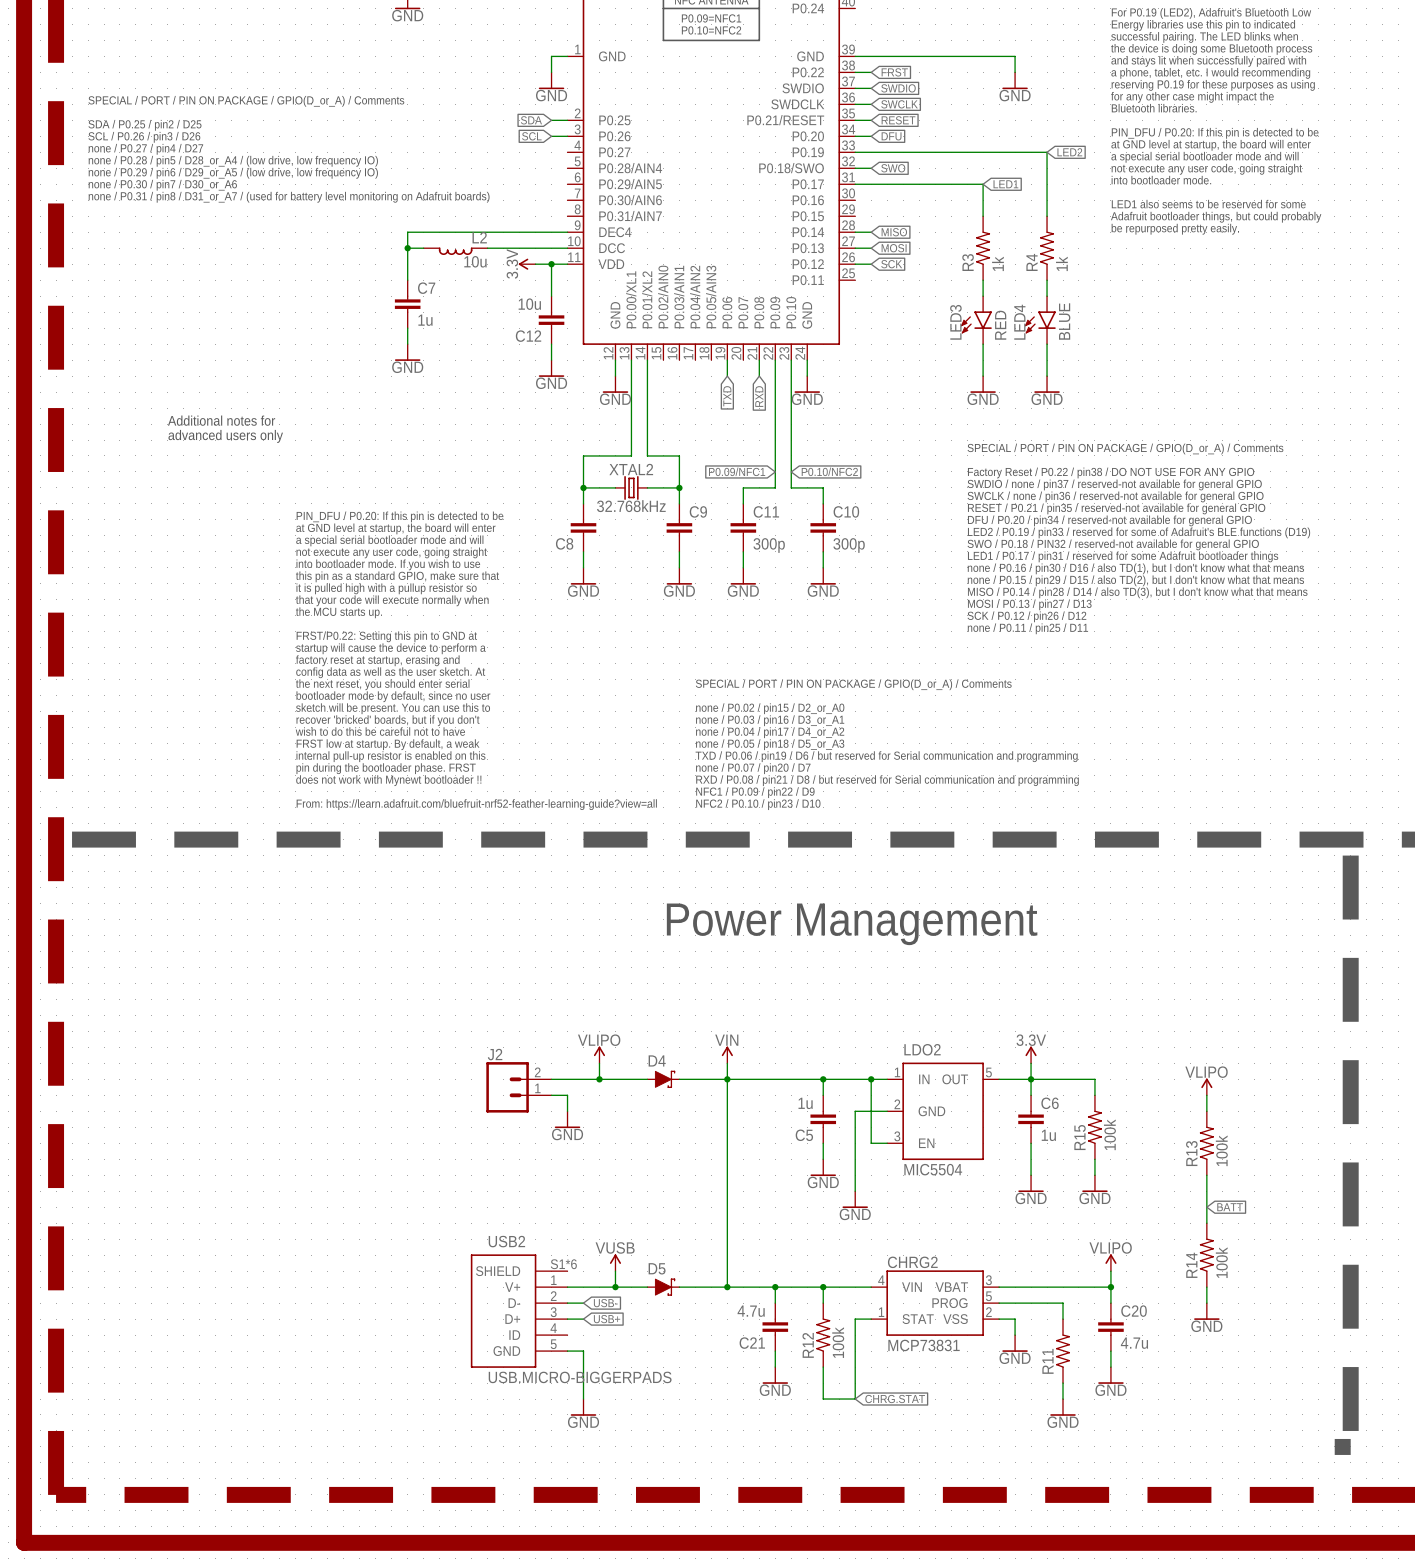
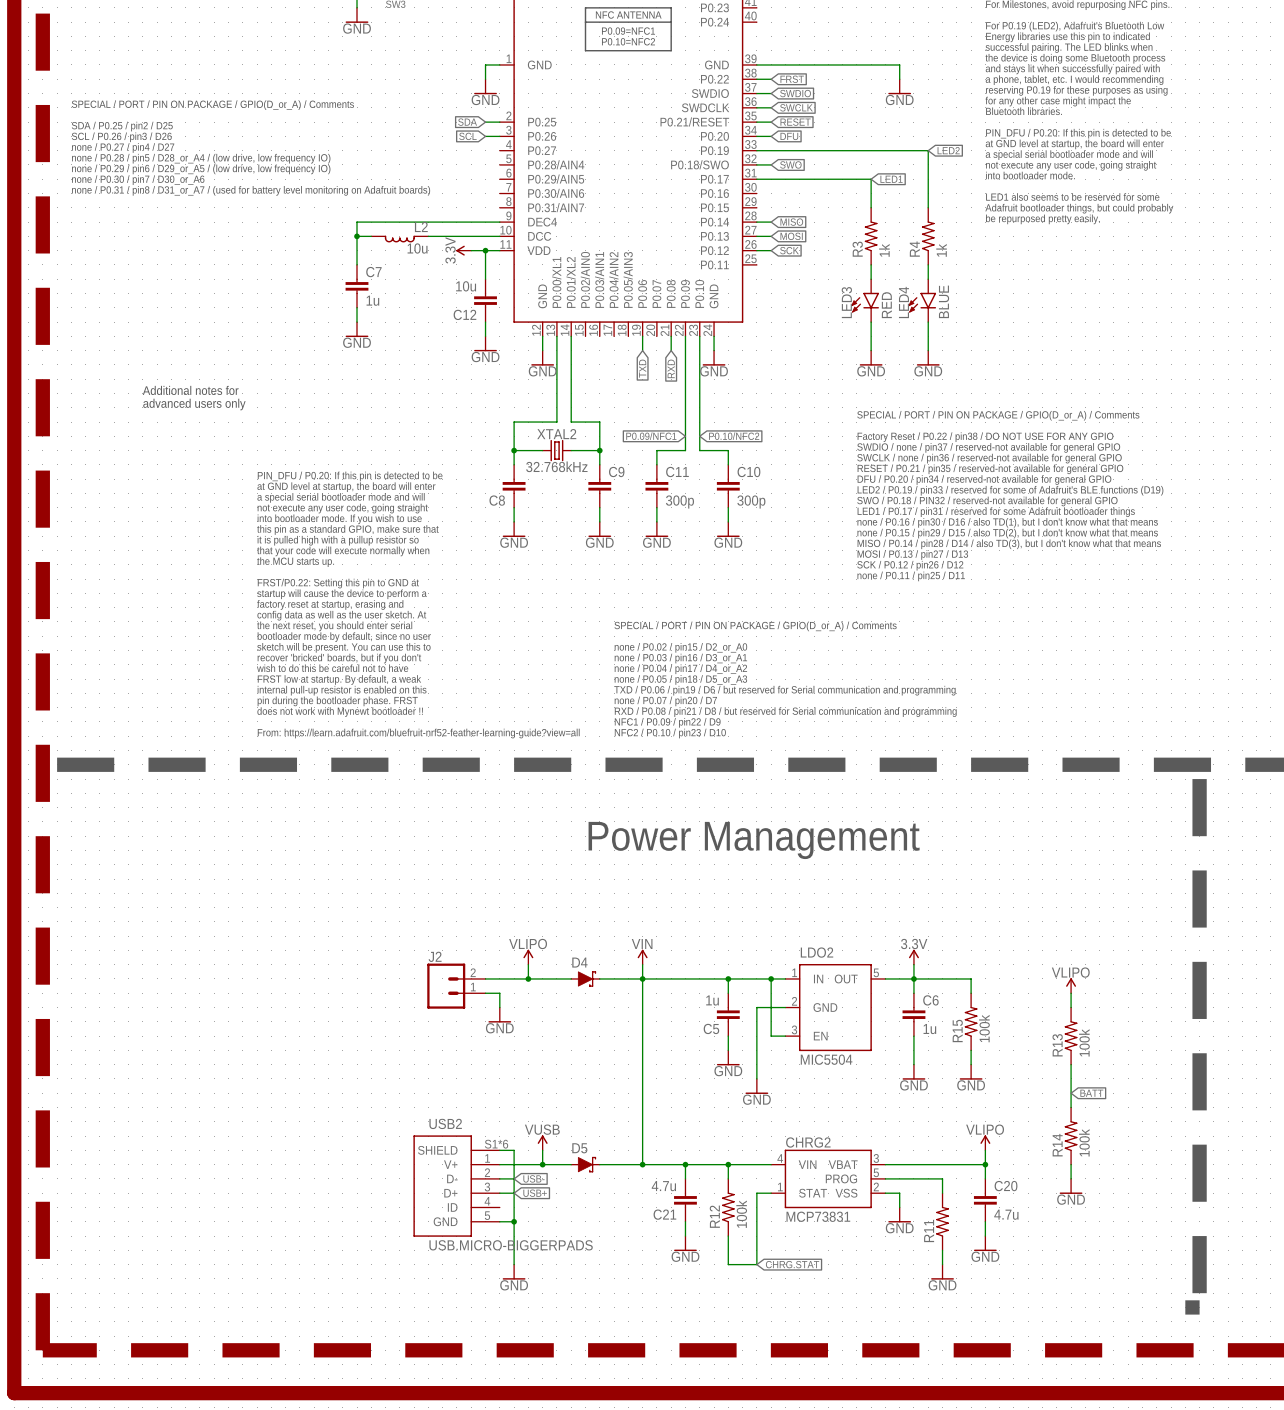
wire: none -> (499, 1150) (514, 1150) (514, 1221)
junction: none -> (514, 1221)

